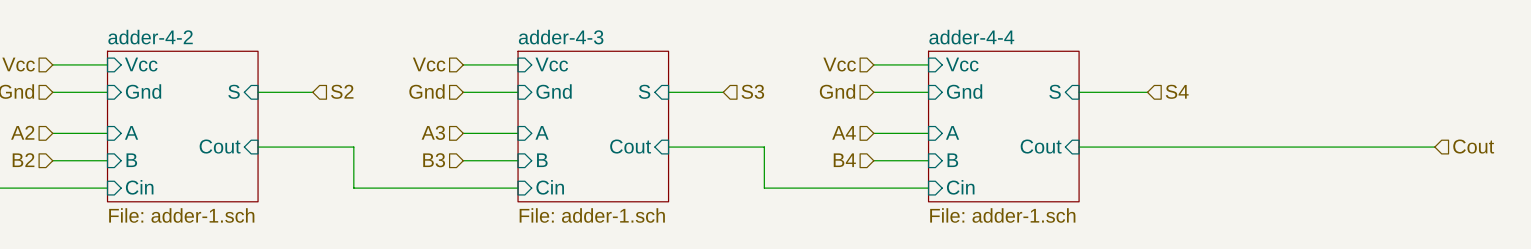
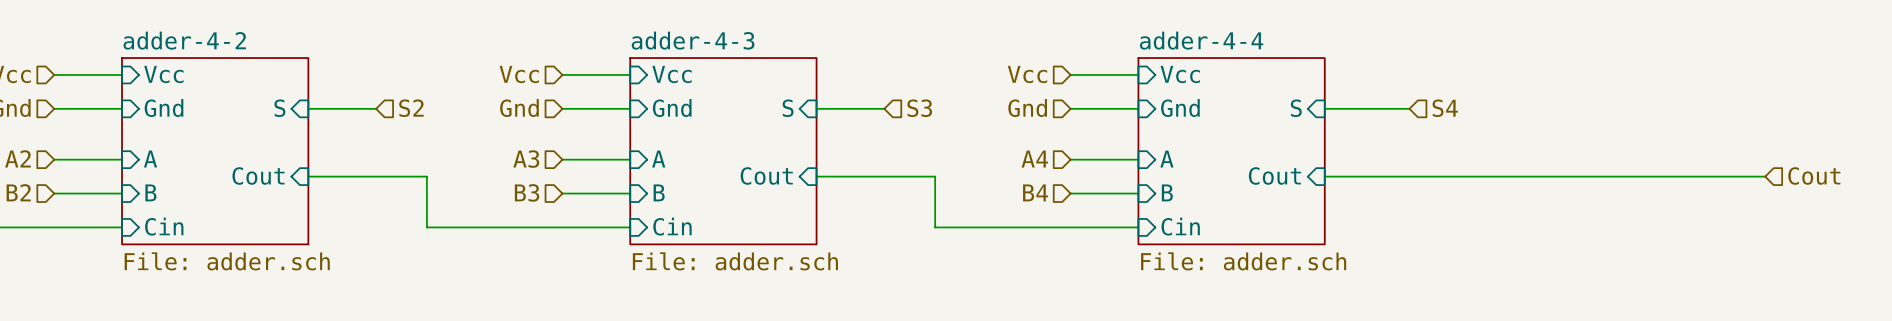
sheet adder-4-2 value: File: adder-1.sch (181, 215) -> File: adder.sch (227, 261)
sheet adder-4-3 value: File: adder-1.sch (592, 215) -> File: adder.sch (735, 261)
sheet adder-4-4 value: File: adder-1.sch (1002, 215) -> File: adder.sch (1243, 261)

